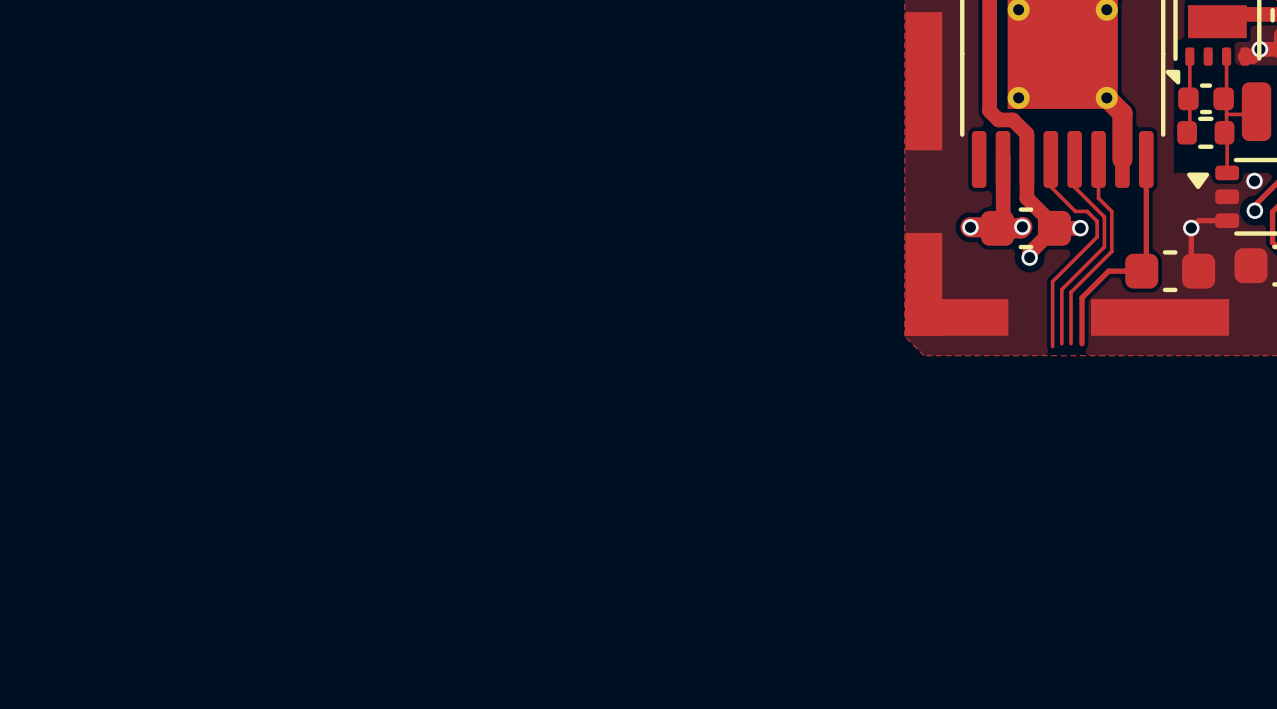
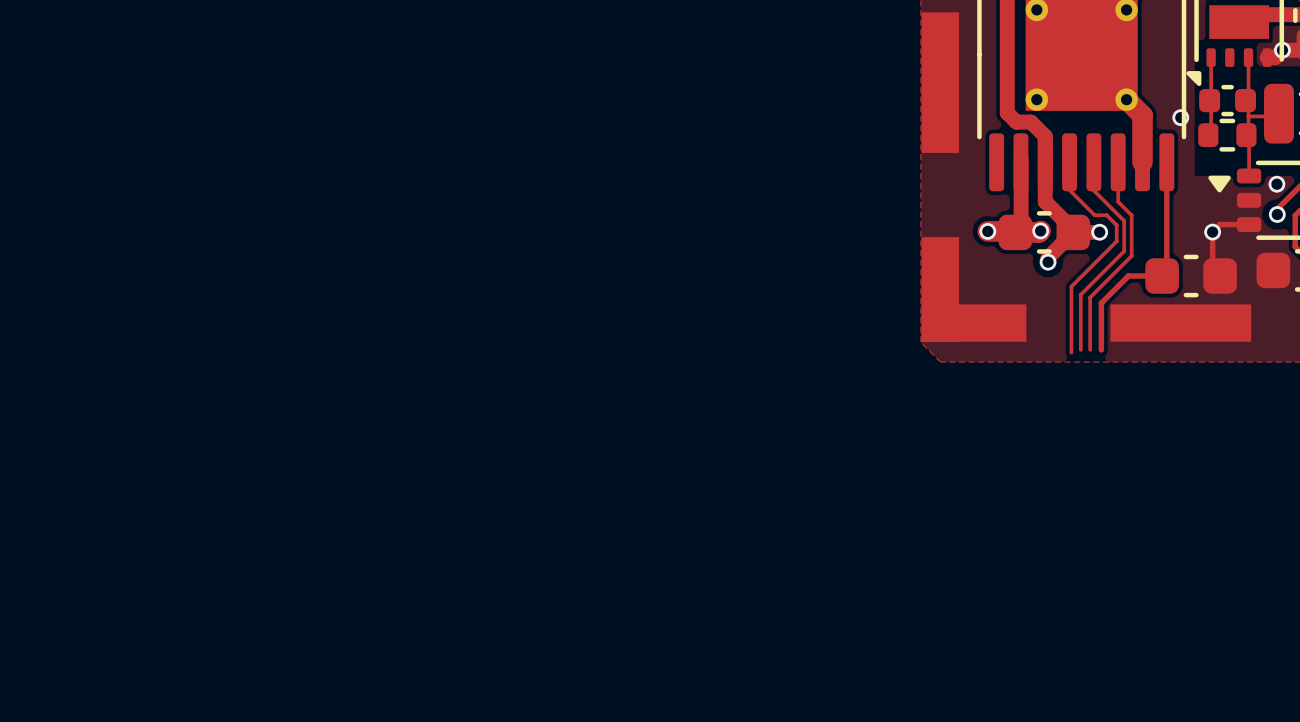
via: none -> (1180, 117)

